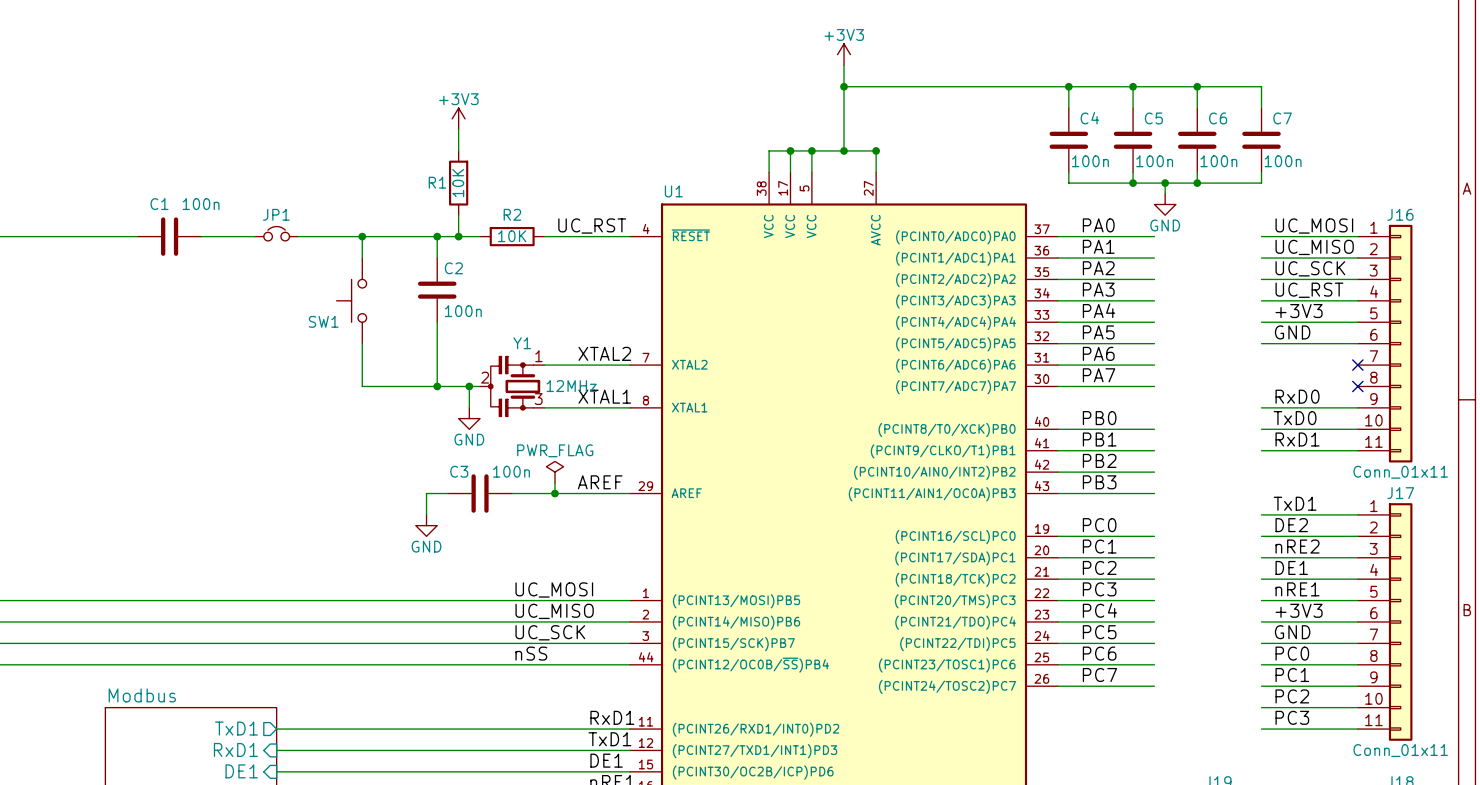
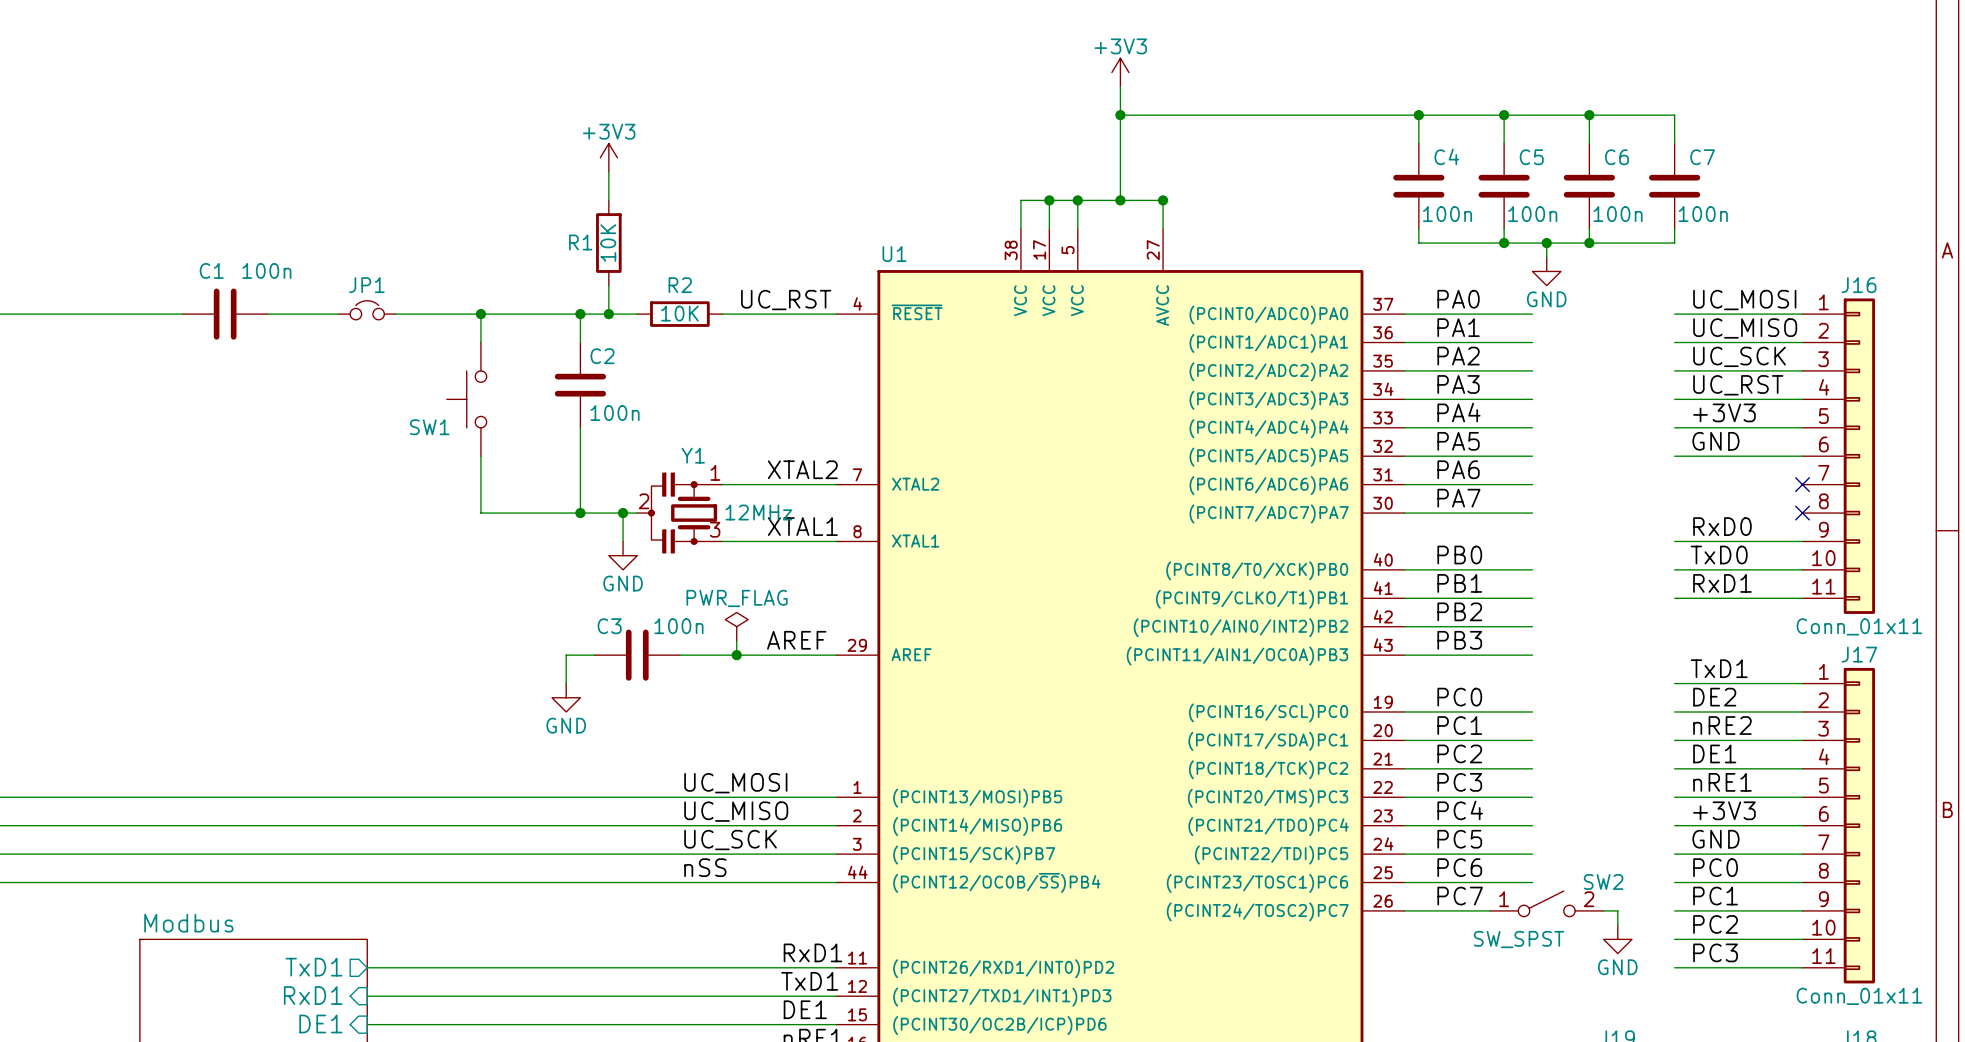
SW2: none -> SW_SPST (1546, 903)
wire: none -> (1603, 910) (1617, 910) (1617, 925)
power symbol: none -> GND (1617, 939)

